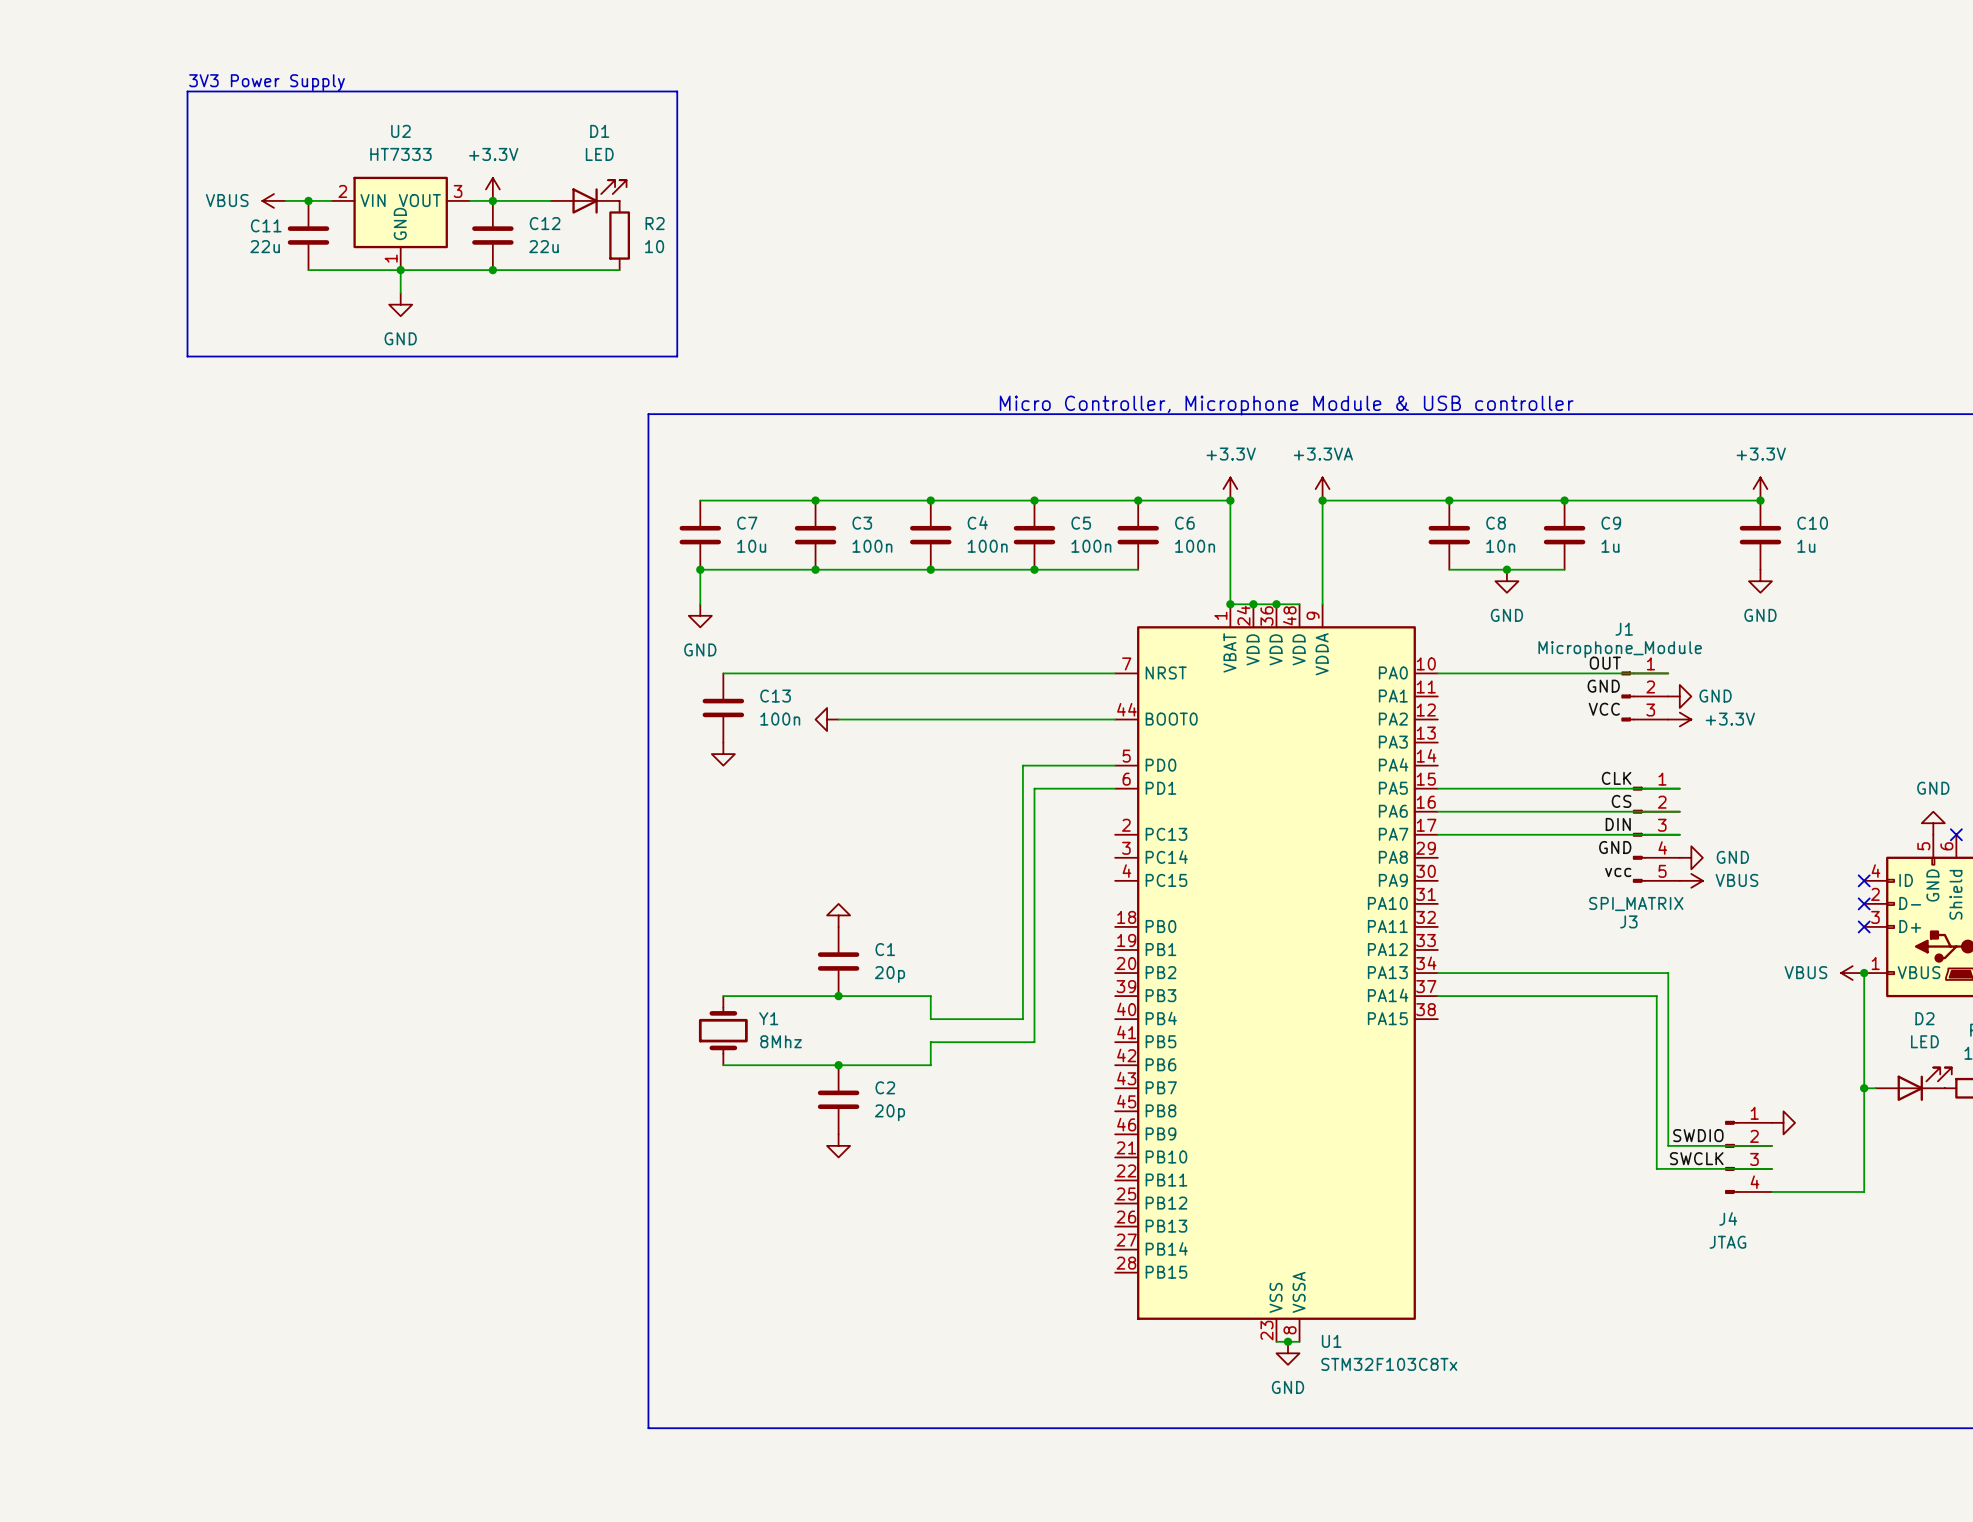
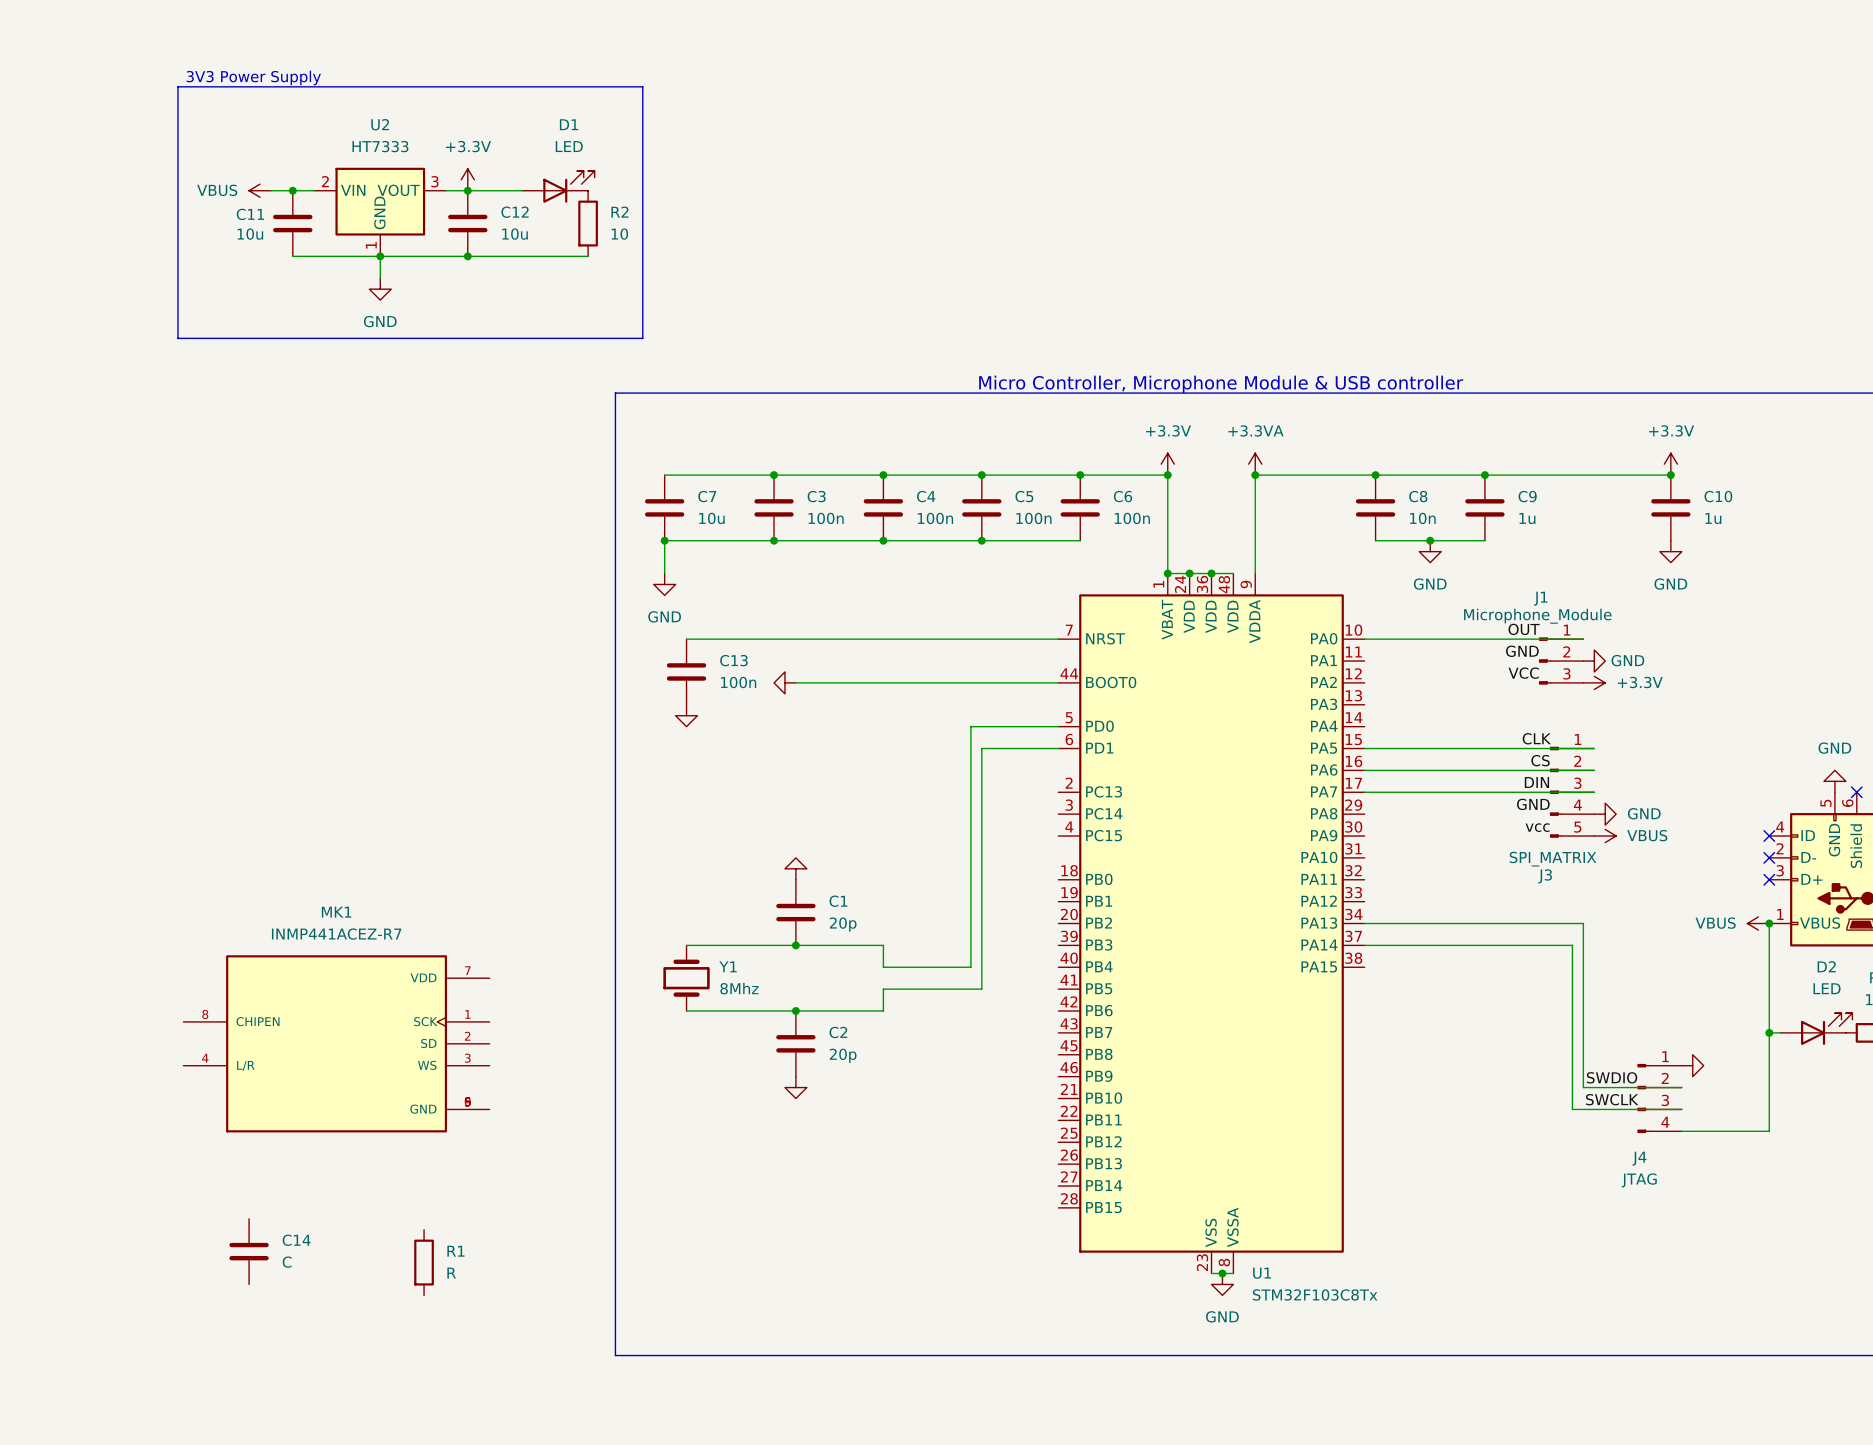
C11 value: 22u (265, 246) -> 10u (250, 234)
C12 value: 22u (544, 246) -> 10u (515, 234)
MK1: none -> INMP441ACEZ-R7 (336, 1043)
C14: none -> C (249, 1251)
R1: none -> R (424, 1262)

